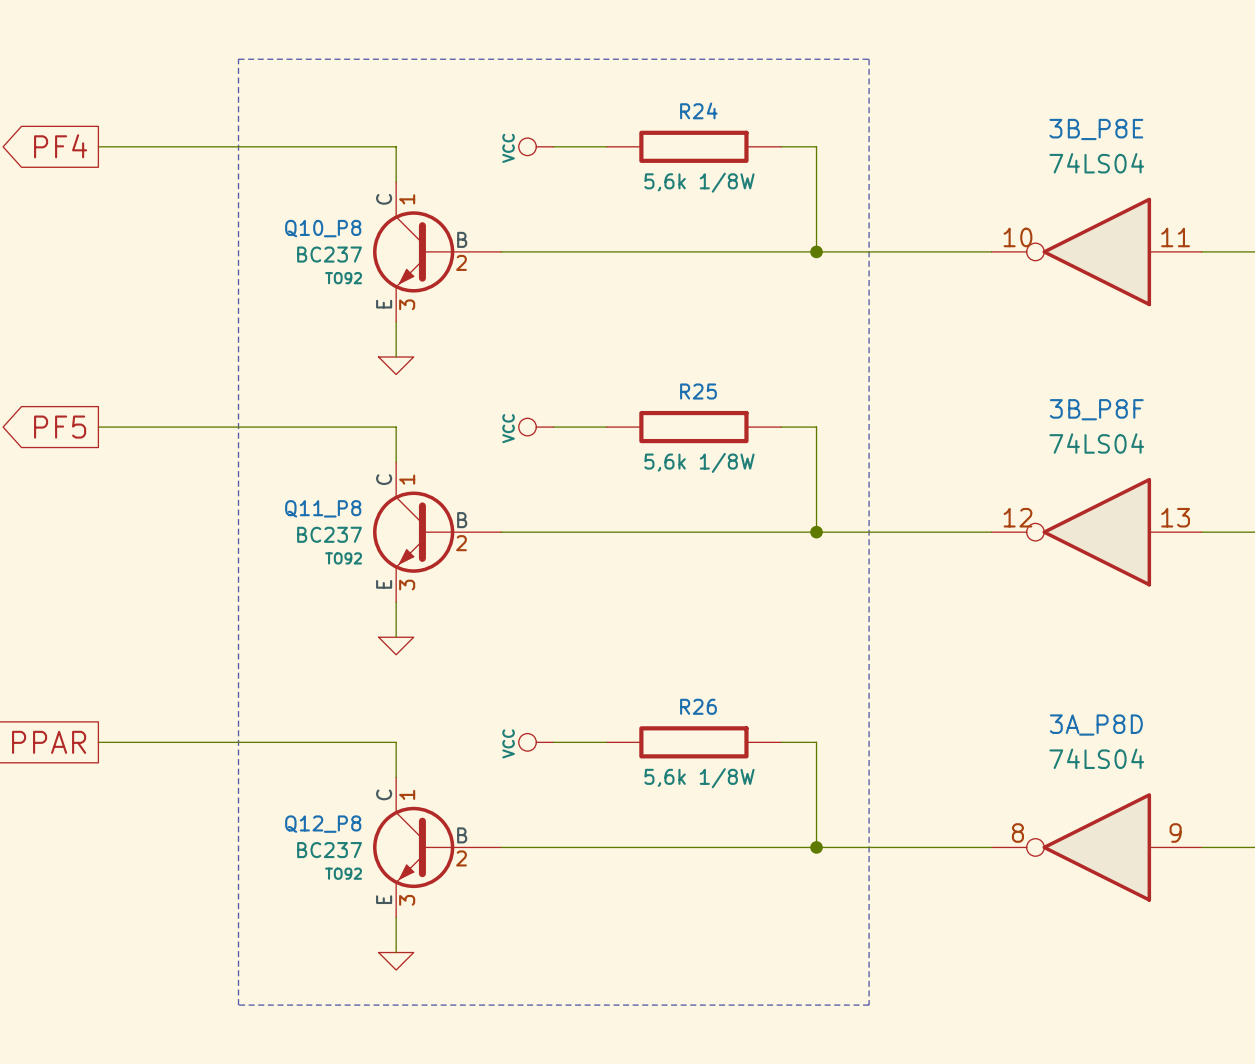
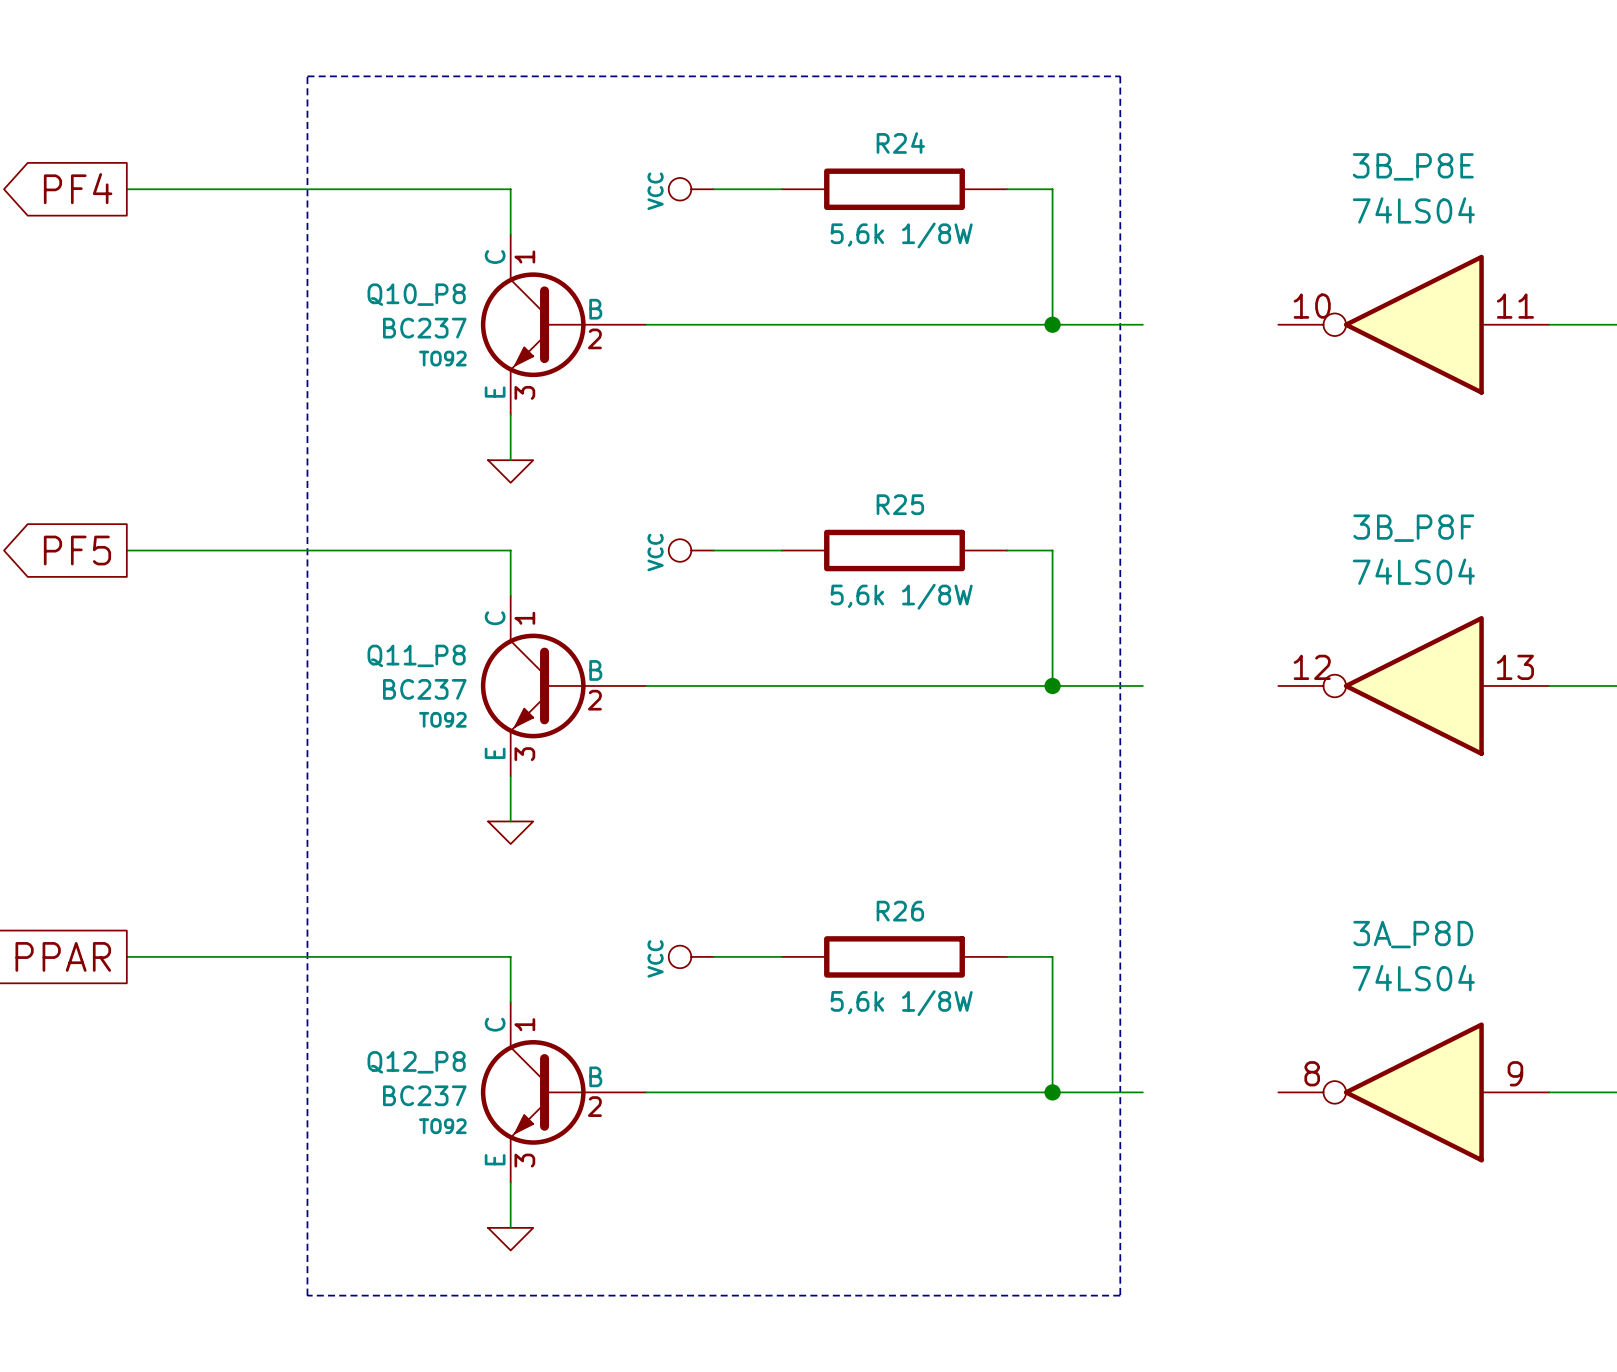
wire: (886, 251) (991, 251) -> none
wire: (886, 532) (991, 532) -> none
wire: (886, 847) (991, 847) -> none

